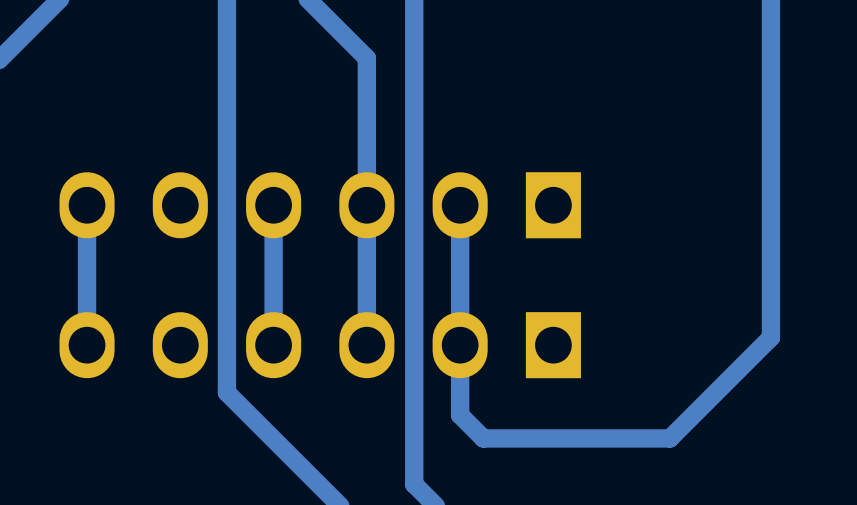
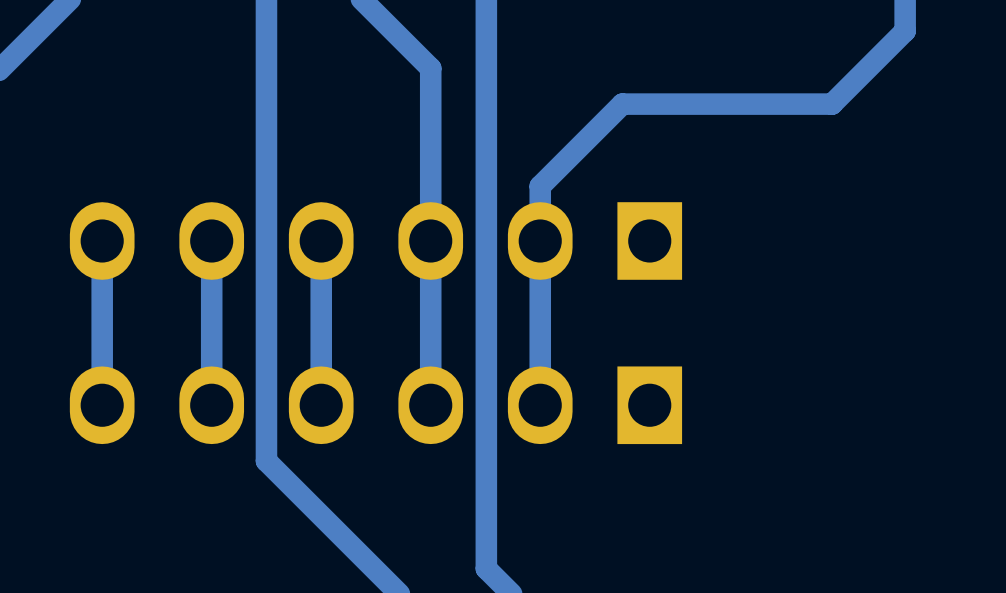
track: (770, 26) (770, 337) (670, 438) (483, 438) (460, 415) (460, 345) -> (905, 30) (832, 104) (622, 104) (540, 186) (540, 240)
track: none -> (211, 240) (211, 405)

